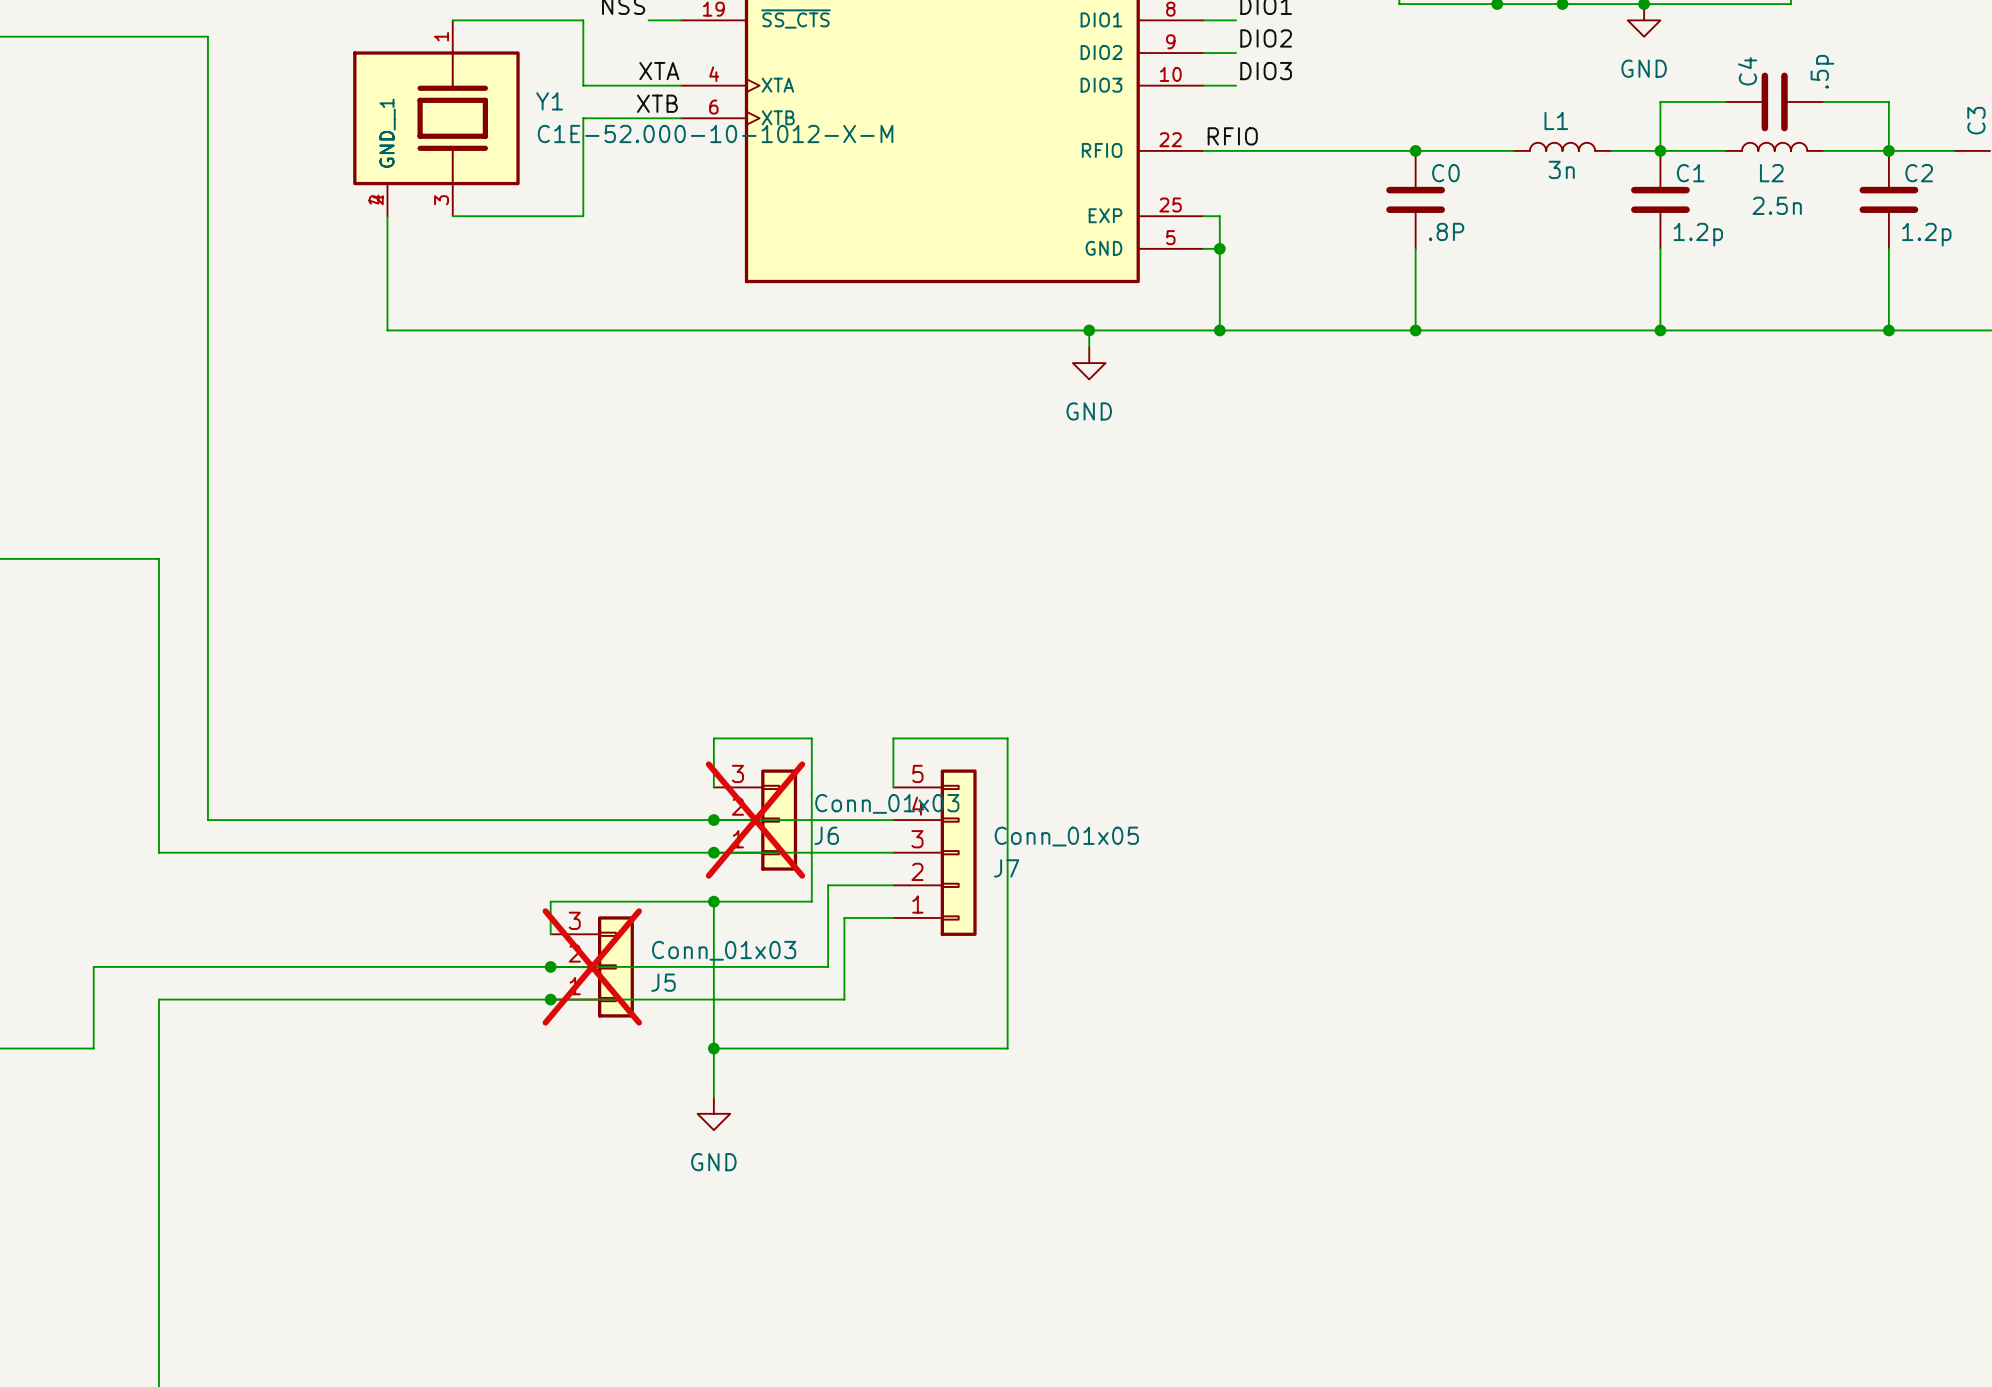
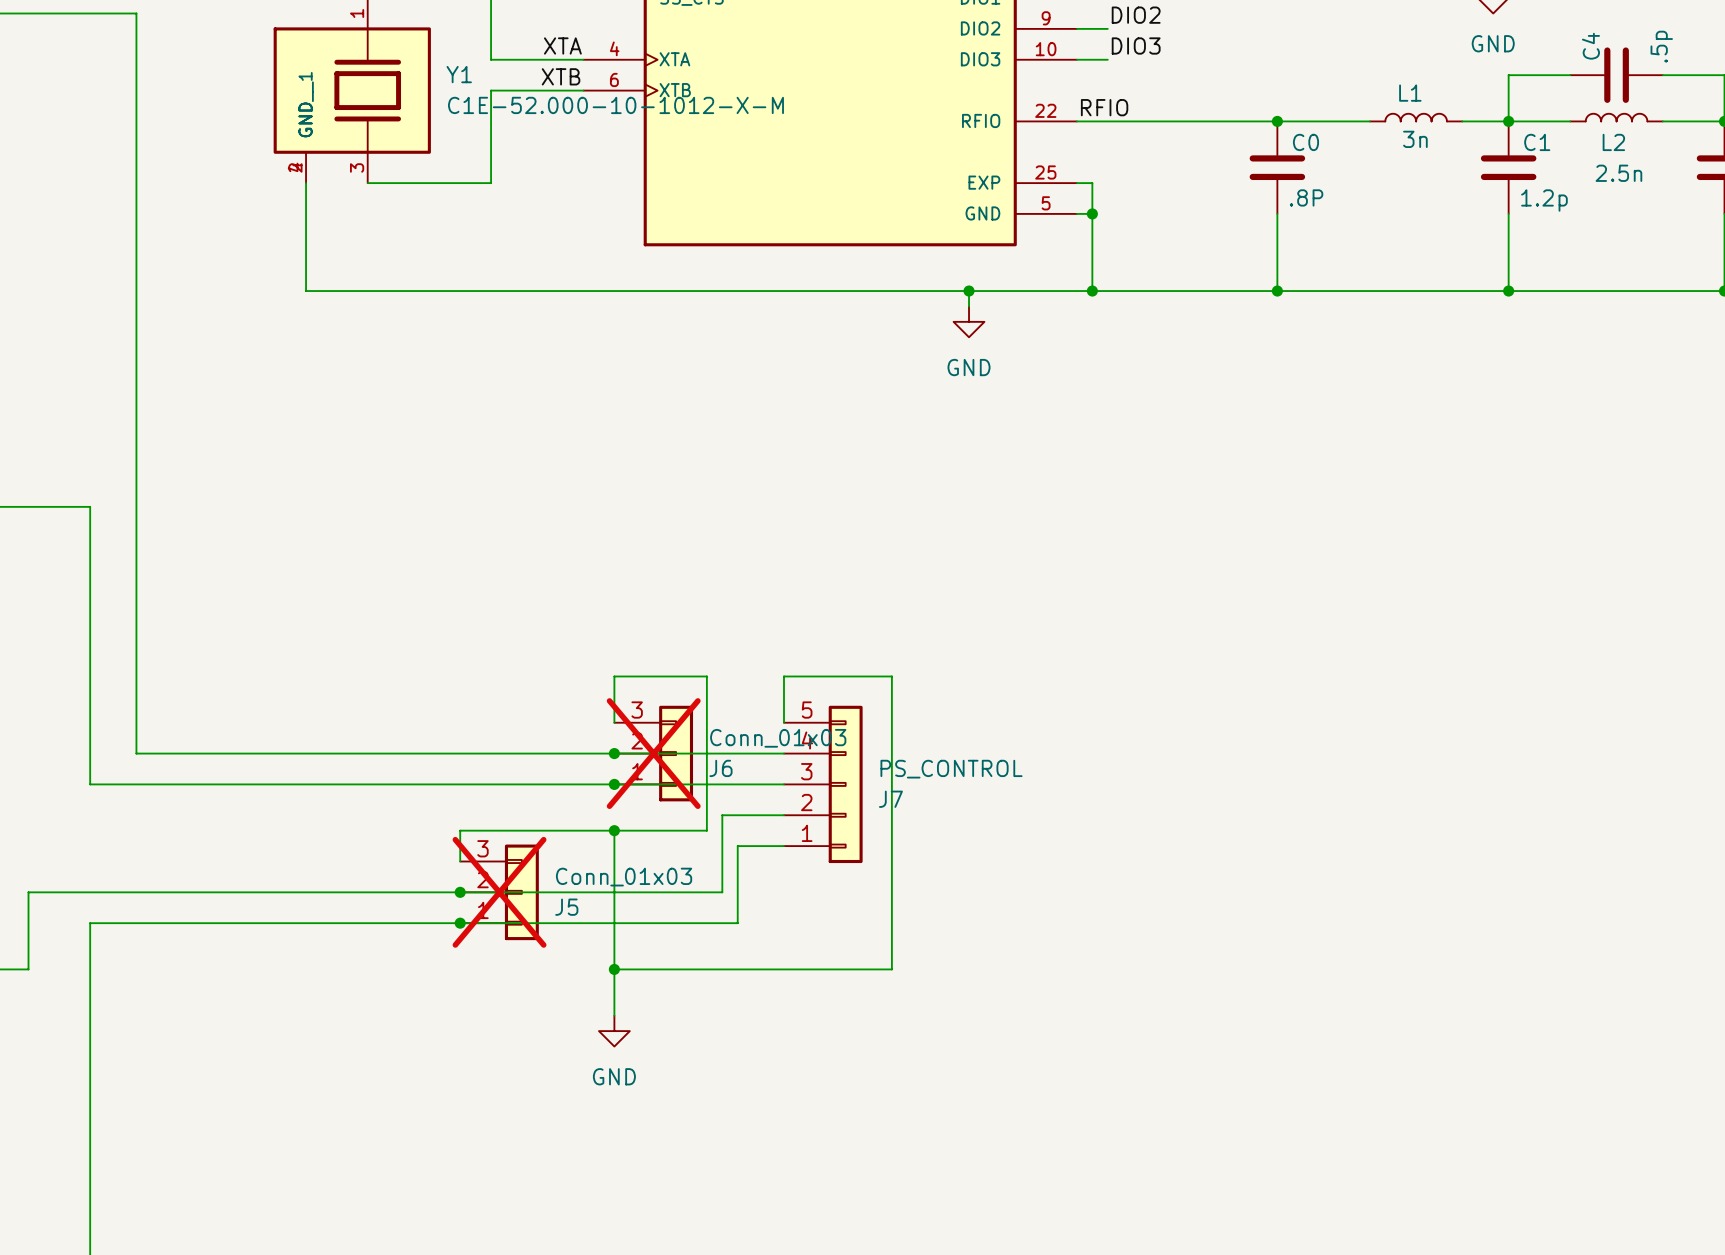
J7 value: Conn_01x05 (1066, 836) -> PS_CONTROL (951, 769)

